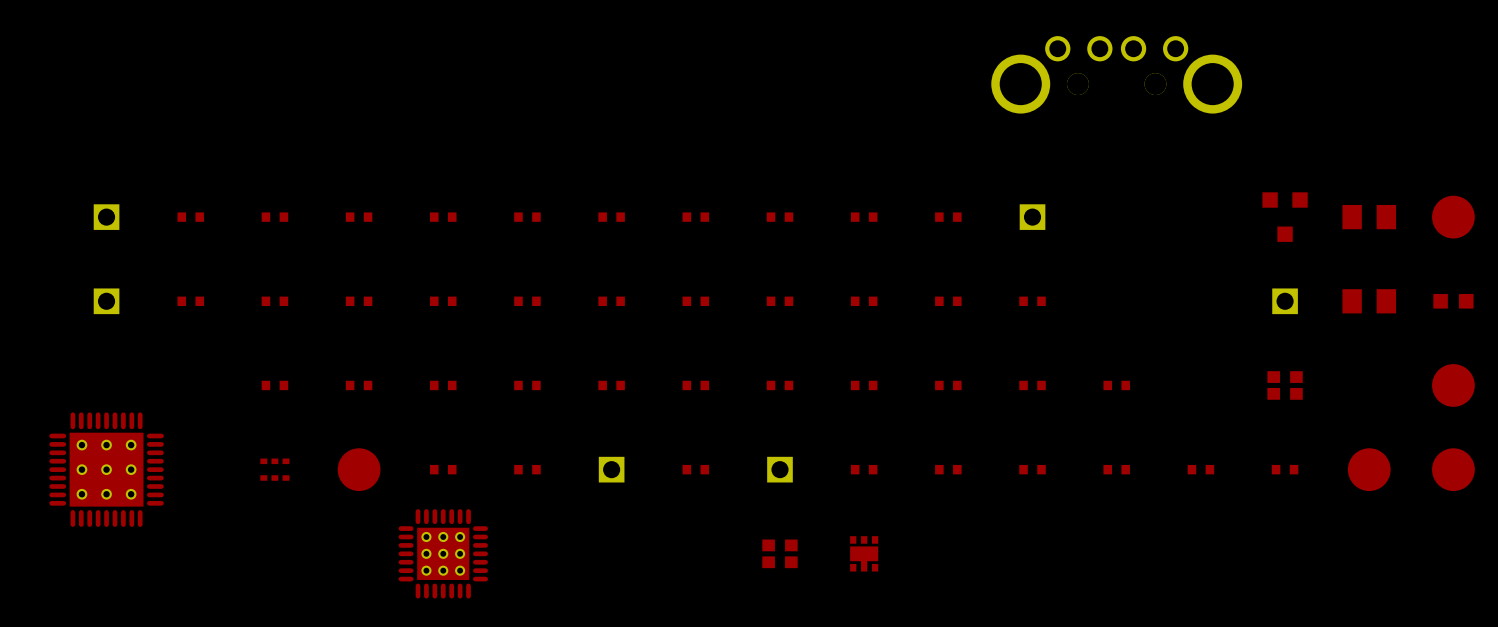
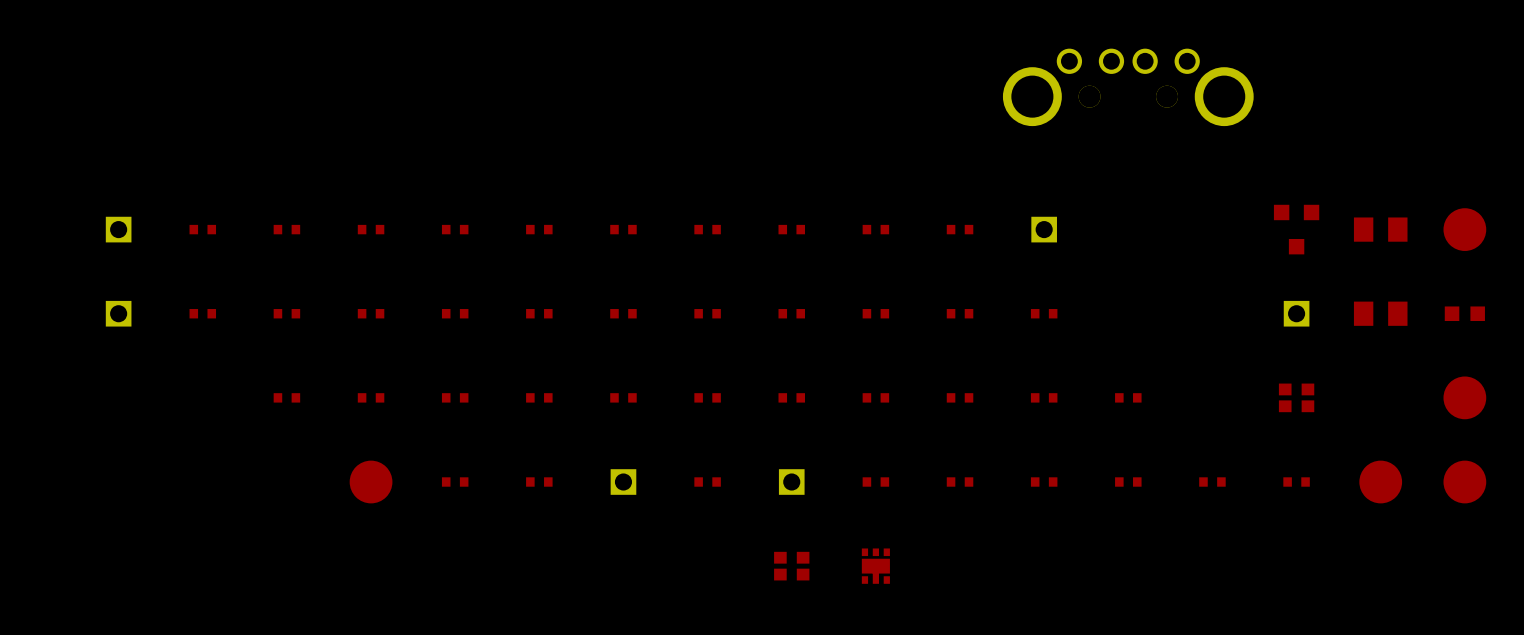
part: (106, 469) -> none
part: (274, 469) -> none
part: (443, 553) -> none

